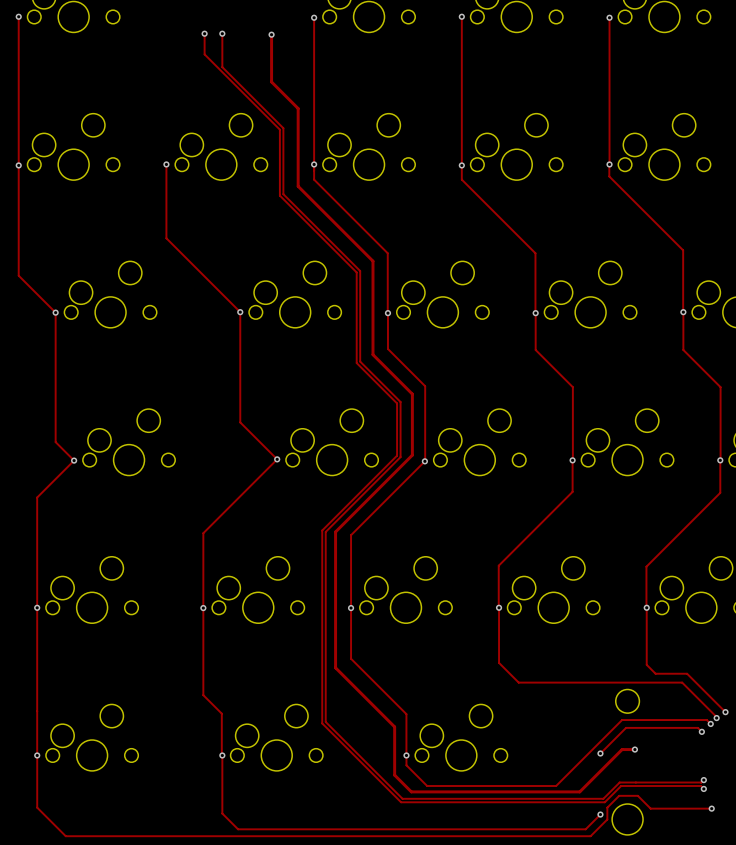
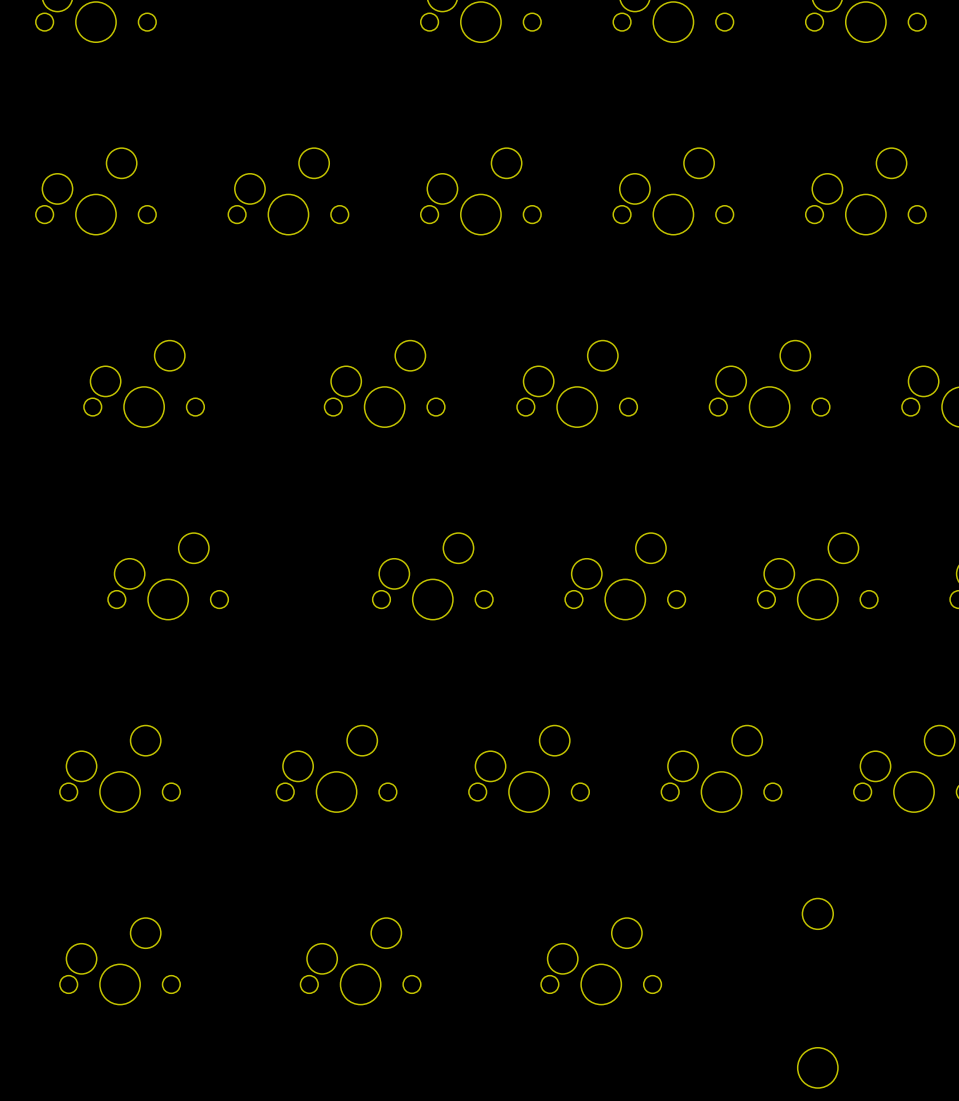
track: (18, 16) (18, 275) (55, 312) (55, 442) (74, 460) (37, 497) (37, 755) -> none
via: (18, 16) -> none
track: (461, 16) (461, 179) (535, 253) (535, 349) (572, 387) (572, 491) (498, 565) (499, 662) (518, 682) (682, 682) (716, 718) -> none
via: (461, 16) -> none
track: (314, 17) (314, 179) (387, 253) (387, 349) (425, 386) (425, 461) (351, 535) (351, 658) (406, 714) (406, 765) (427, 785) (556, 785) (622, 720) (706, 720) (710, 723) -> none
via: (314, 17) -> none
track: (609, 17) (609, 176) (683, 250) (683, 349) (720, 387) (720, 492) (646, 566) (646, 664) (655, 673) (687, 673) (725, 712) -> none
via: (609, 17) -> none
track: (204, 33) (204, 54) (279, 129) (279, 195) (356, 272) (356, 363) (397, 403) (397, 455) (322, 530) (322, 723) (401, 802) (604, 802) (621, 785) (700, 785) (703, 788) -> none
via: (204, 33) -> none
track: (222, 33) (222, 67) (283, 128) (283, 194) (360, 271) (360, 361) (400, 401) (400, 457) (325, 531) (325, 721) (402, 798) (603, 798) (619, 782) (701, 782) (703, 780) -> none
via: (222, 33) -> none
track: (271, 34) (271, 81) (298, 108) (298, 186) (372, 261) (372, 354) (412, 394) (412, 455) (335, 531) (335, 667) (394, 726) (394, 775) (411, 791) (579, 791) (622, 749) (634, 749) -> none
via: (271, 34) -> none
track: (166, 164) (166, 238) (240, 312) (240, 422) (277, 459) (203, 533) (203, 695) (221, 713) (222, 813) (238, 829) (585, 829) (600, 814) -> none
via: (166, 164) -> none
via: (314, 164) -> none
via: (609, 164) -> none
via: (18, 165) -> none
via: (461, 165) -> none
via: (55, 312) -> none
via: (240, 312) -> none
via: (683, 312) -> none
via: (387, 313) -> none
via: (535, 313) -> none
via: (277, 459) -> none
via: (74, 460) -> none
via: (572, 460) -> none
via: (720, 460) -> none
via: (424, 461) -> none
via: (37, 607) -> none
via: (499, 607) -> none
via: (646, 607) -> none
via: (203, 608) -> none
via: (351, 608) -> none
via: (725, 712) -> none
via: (716, 718) -> none
via: (710, 723) -> none
track: (701, 731) (697, 727) (626, 727) (600, 753) -> none
via: (701, 731) -> none
via: (634, 749) -> none
via: (600, 753) -> none
track: (37, 755) (37, 807) (65, 836) (590, 836) (607, 819) (607, 807) (619, 795) (637, 795) (650, 808) (711, 808) -> none
via: (37, 755) -> none
via: (222, 755) -> none
via: (406, 755) -> none
via: (703, 780) -> none
via: (703, 788) -> none
via: (711, 808) -> none
via: (600, 814) -> none

